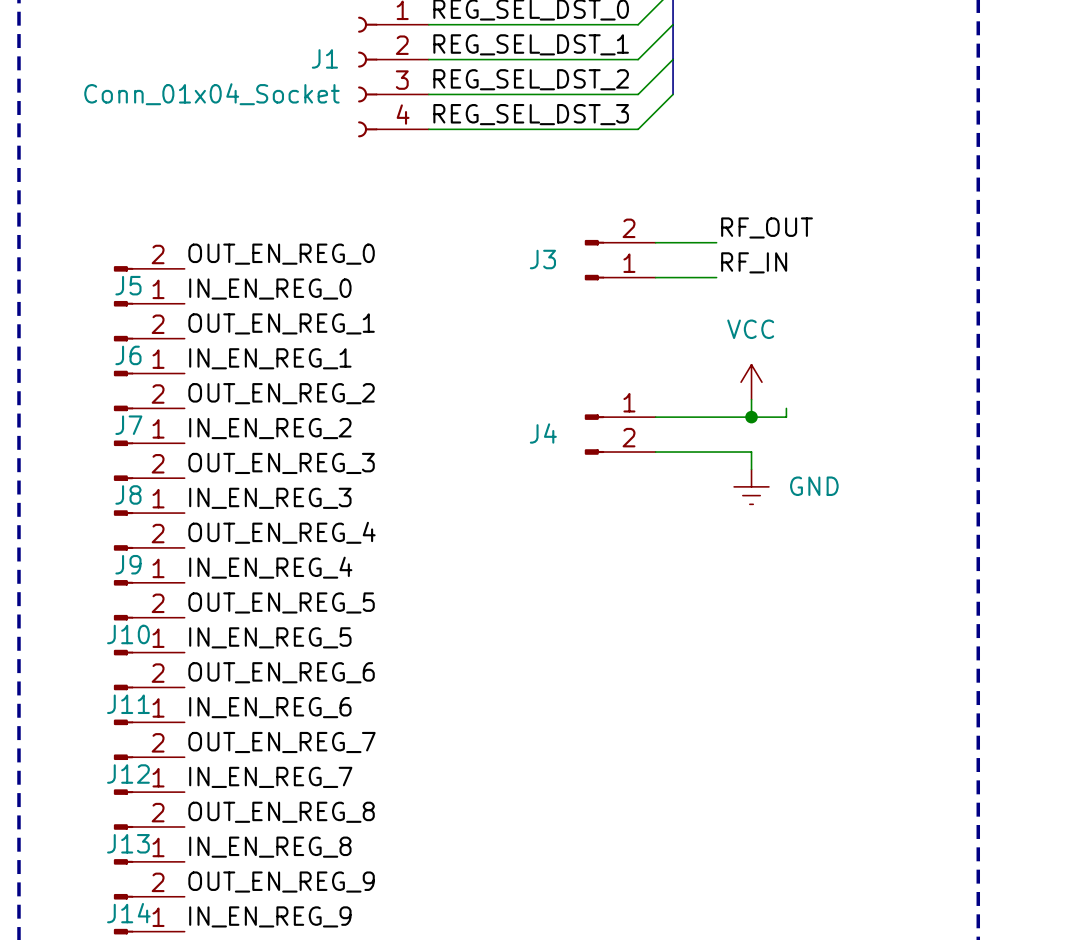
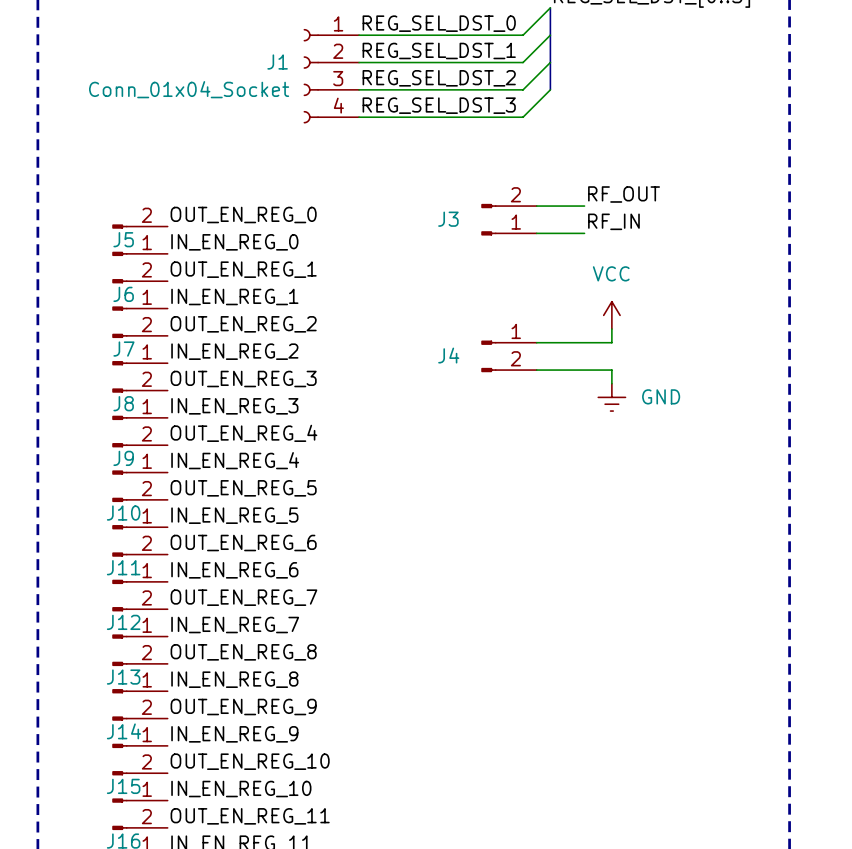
wire: (786, 408) (786, 417) (751, 417) -> none
junction: (751, 417) -> none

